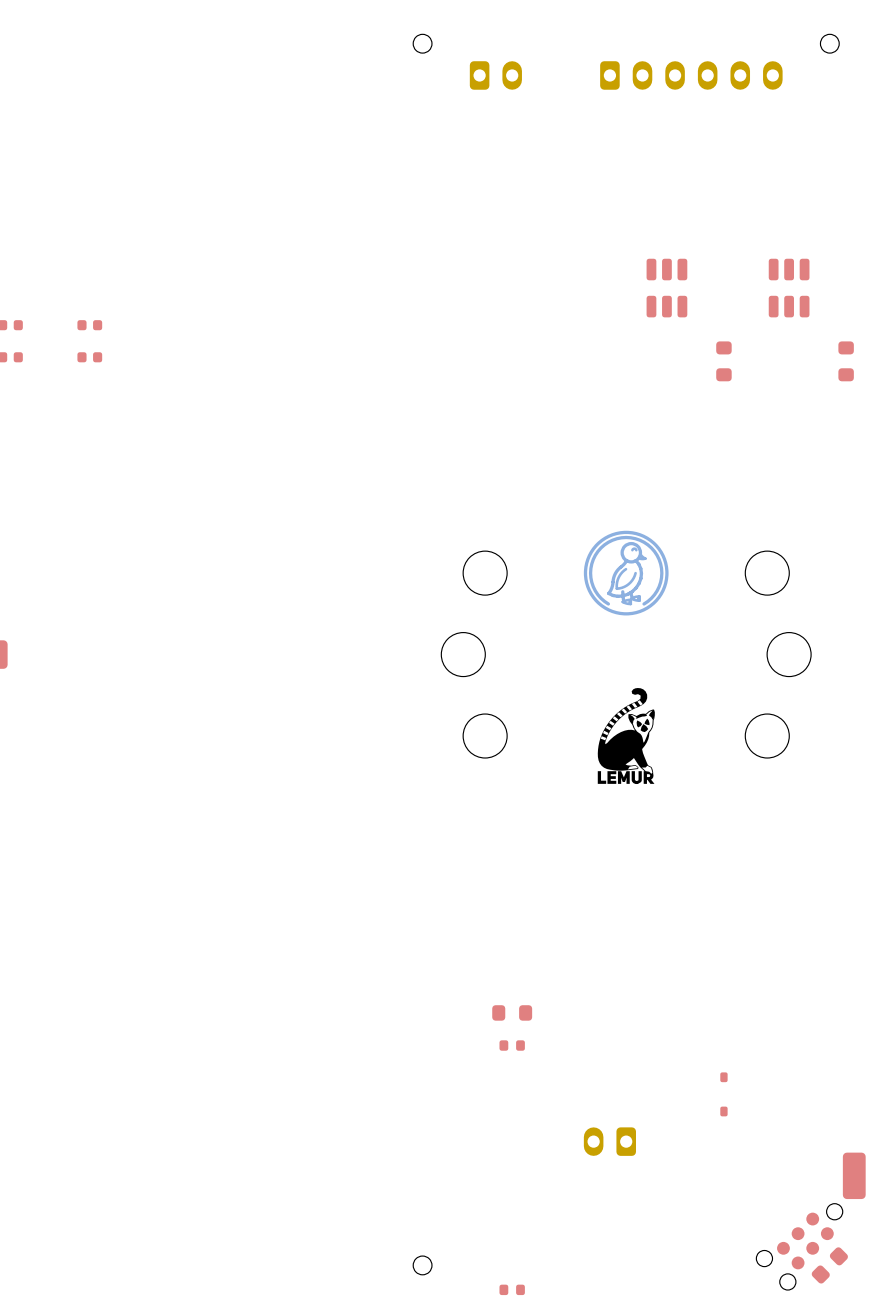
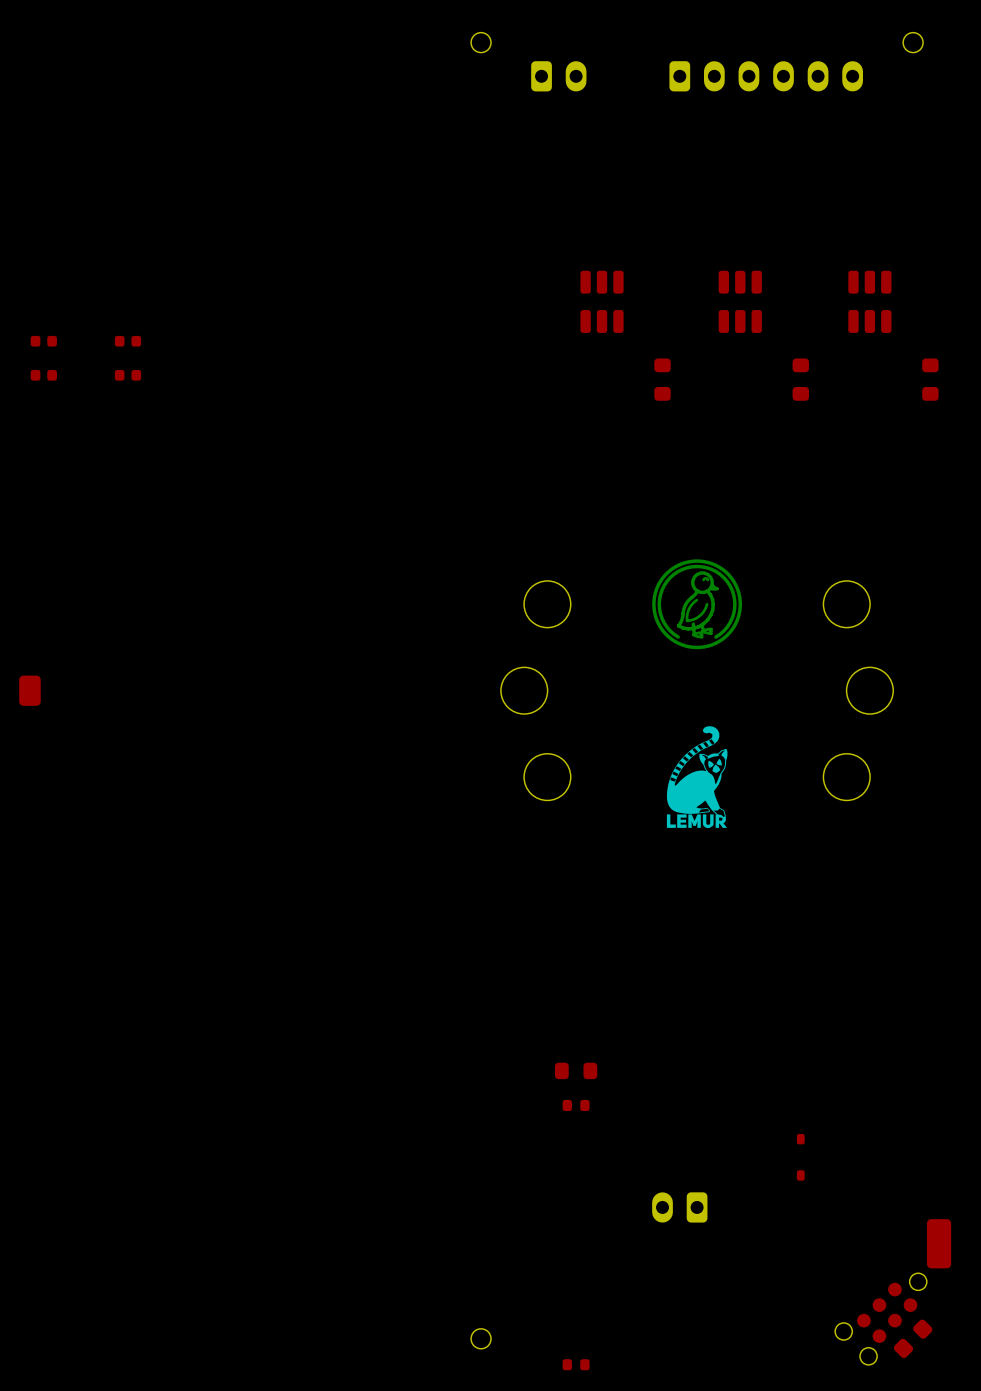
part: none -> (602, 301)
part: none -> (662, 379)

